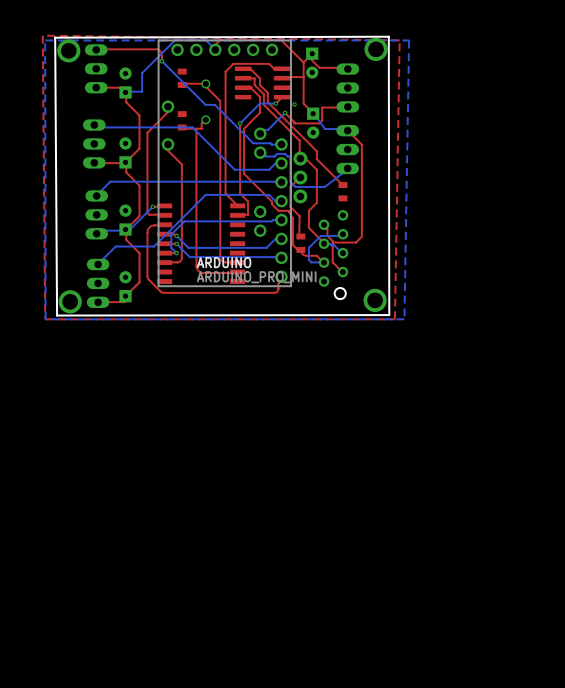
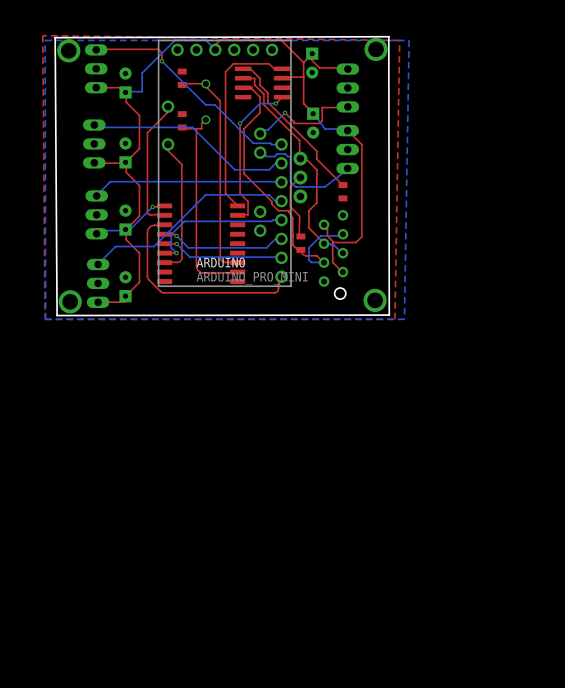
via: (294, 104) -> none

